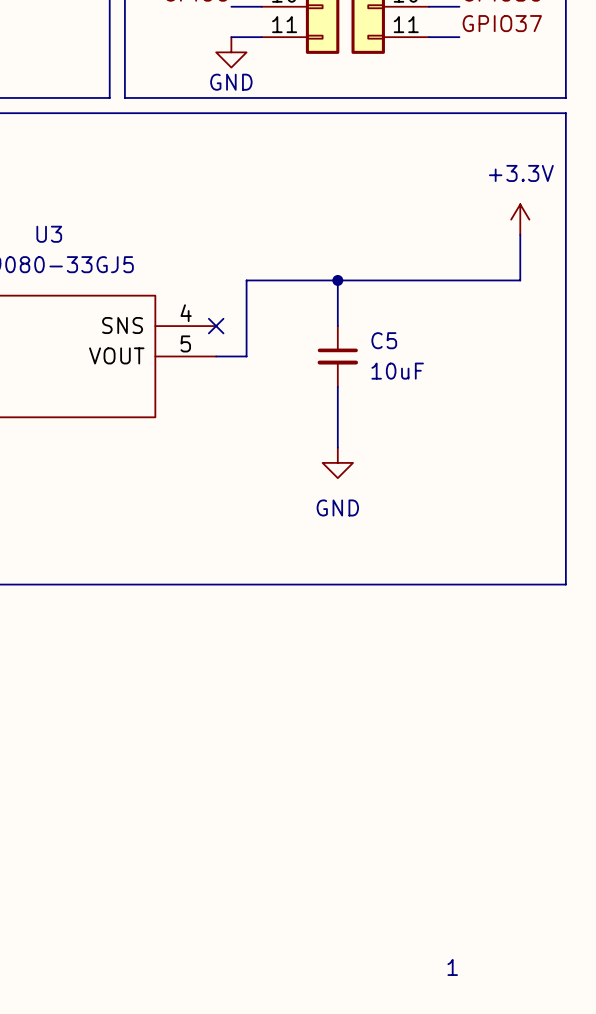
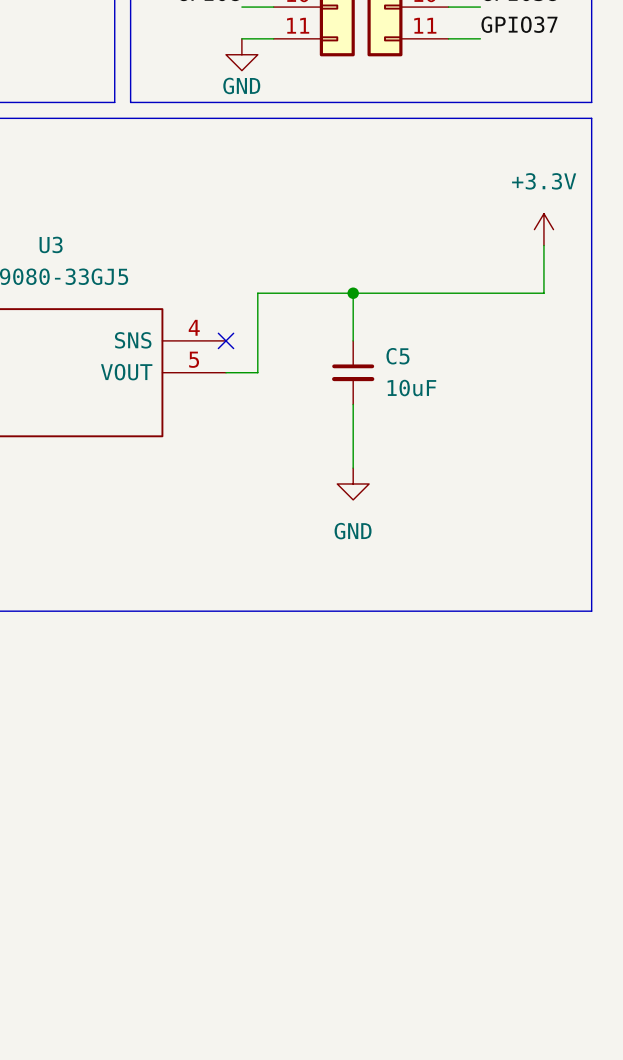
text: 1 (452, 967) -> none

